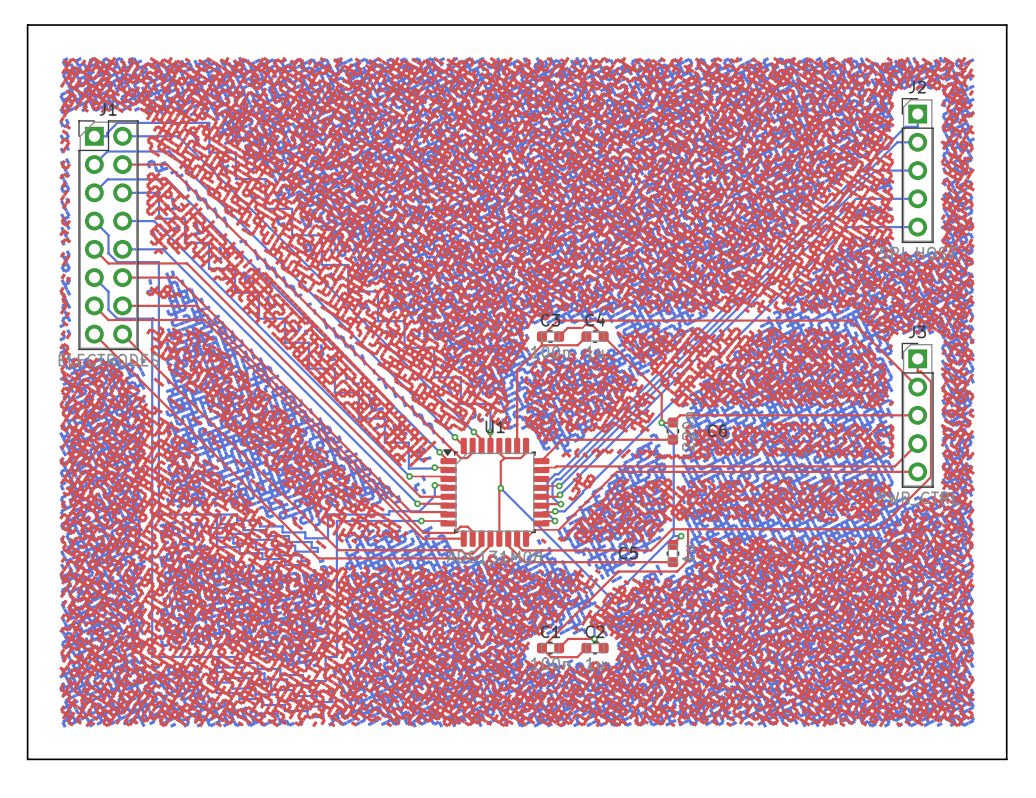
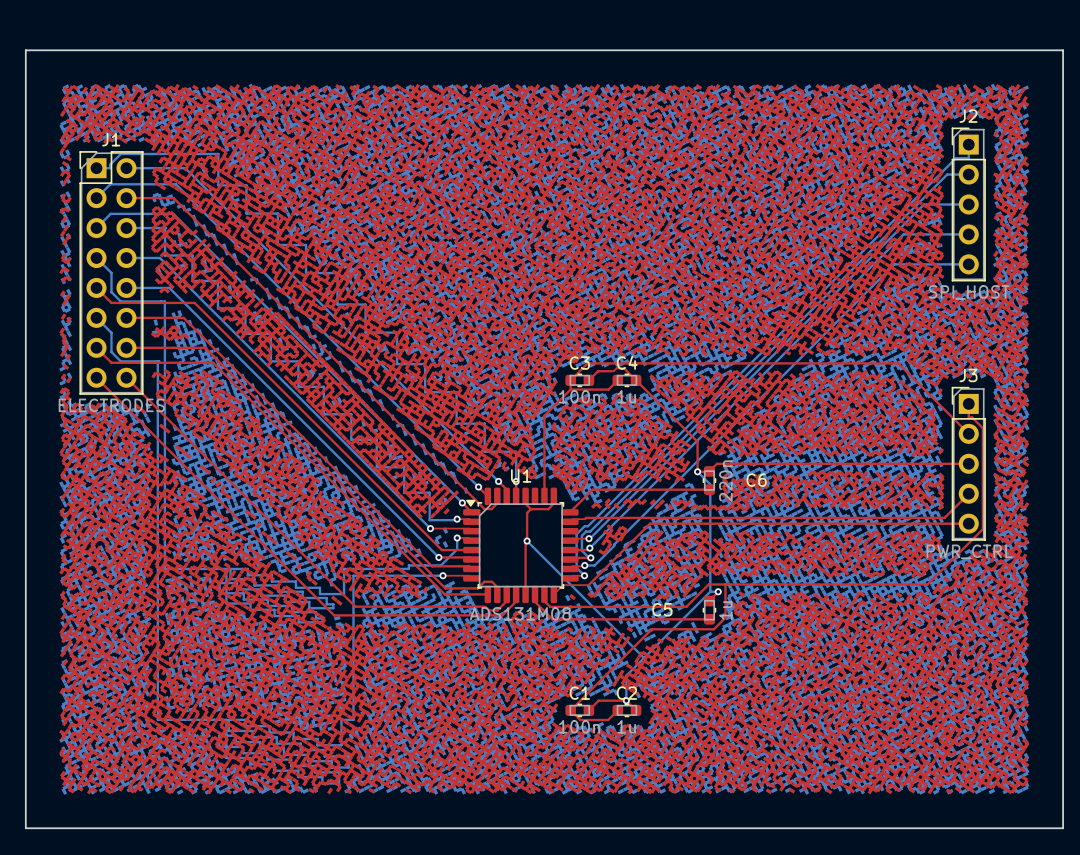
drawing: [275, 216, 286, 227] -> none
drawing: [302, 242, 313, 253] -> none
drawing: none -> [306, 341, 332, 380]
drawing: [317, 344, 337, 362] -> none
drawing: none -> [331, 396, 343, 408]
drawing: [445, 384, 454, 396] -> none
drawing: [417, 454, 432, 462] -> none

